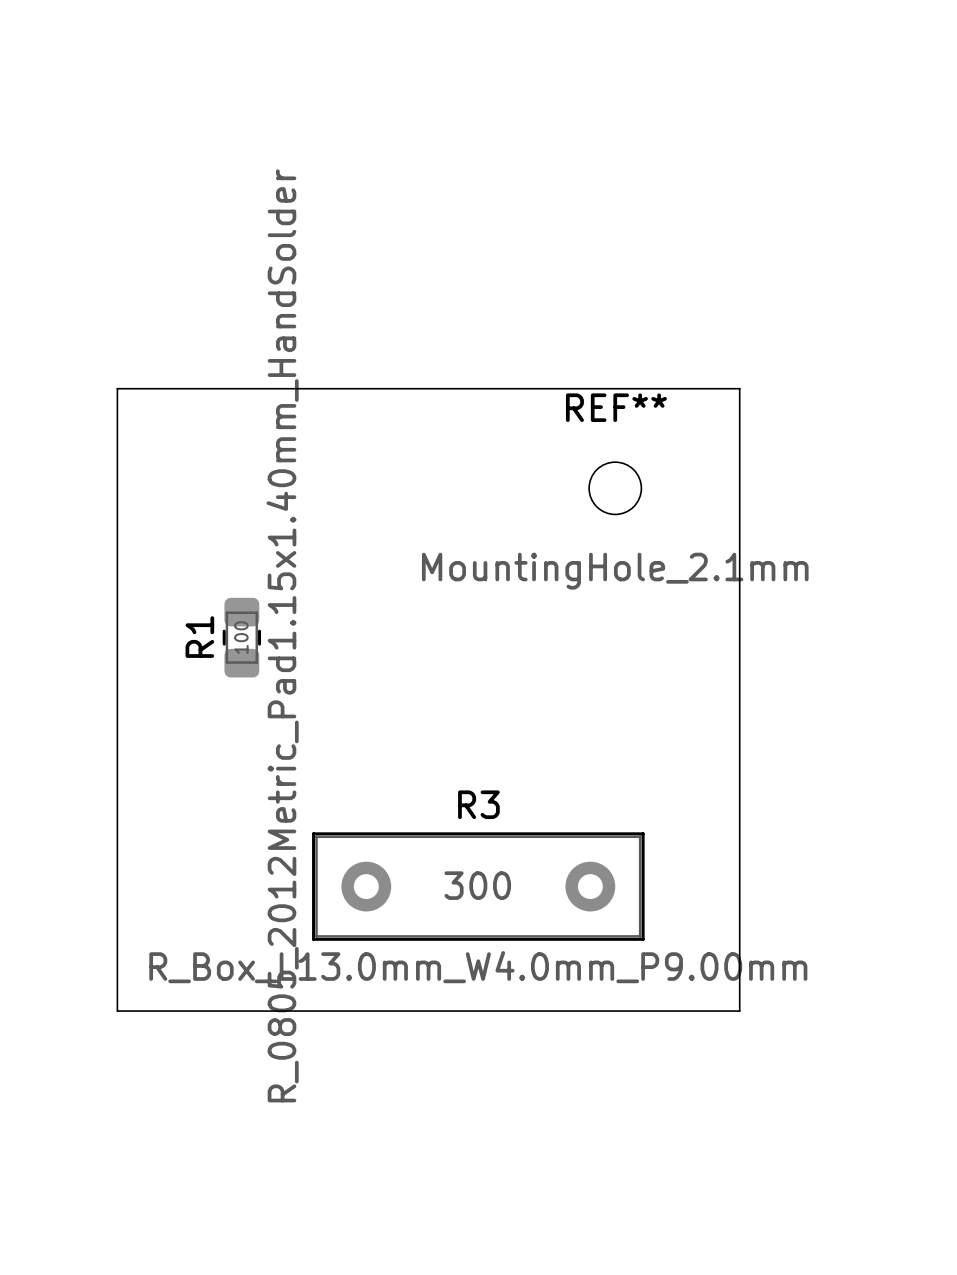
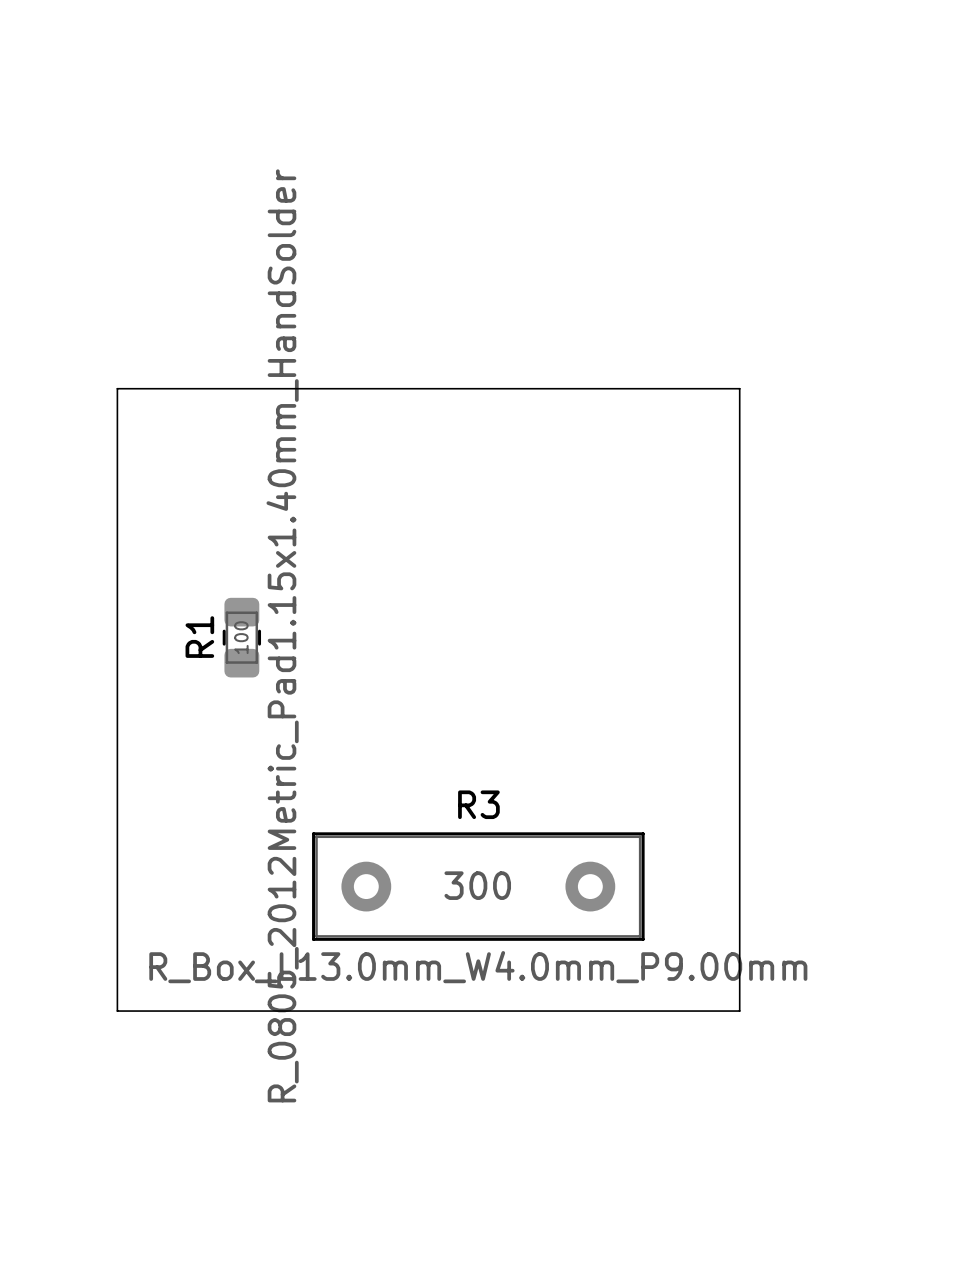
REF**: MountingHole_2.1mm (615, 488) -> none

